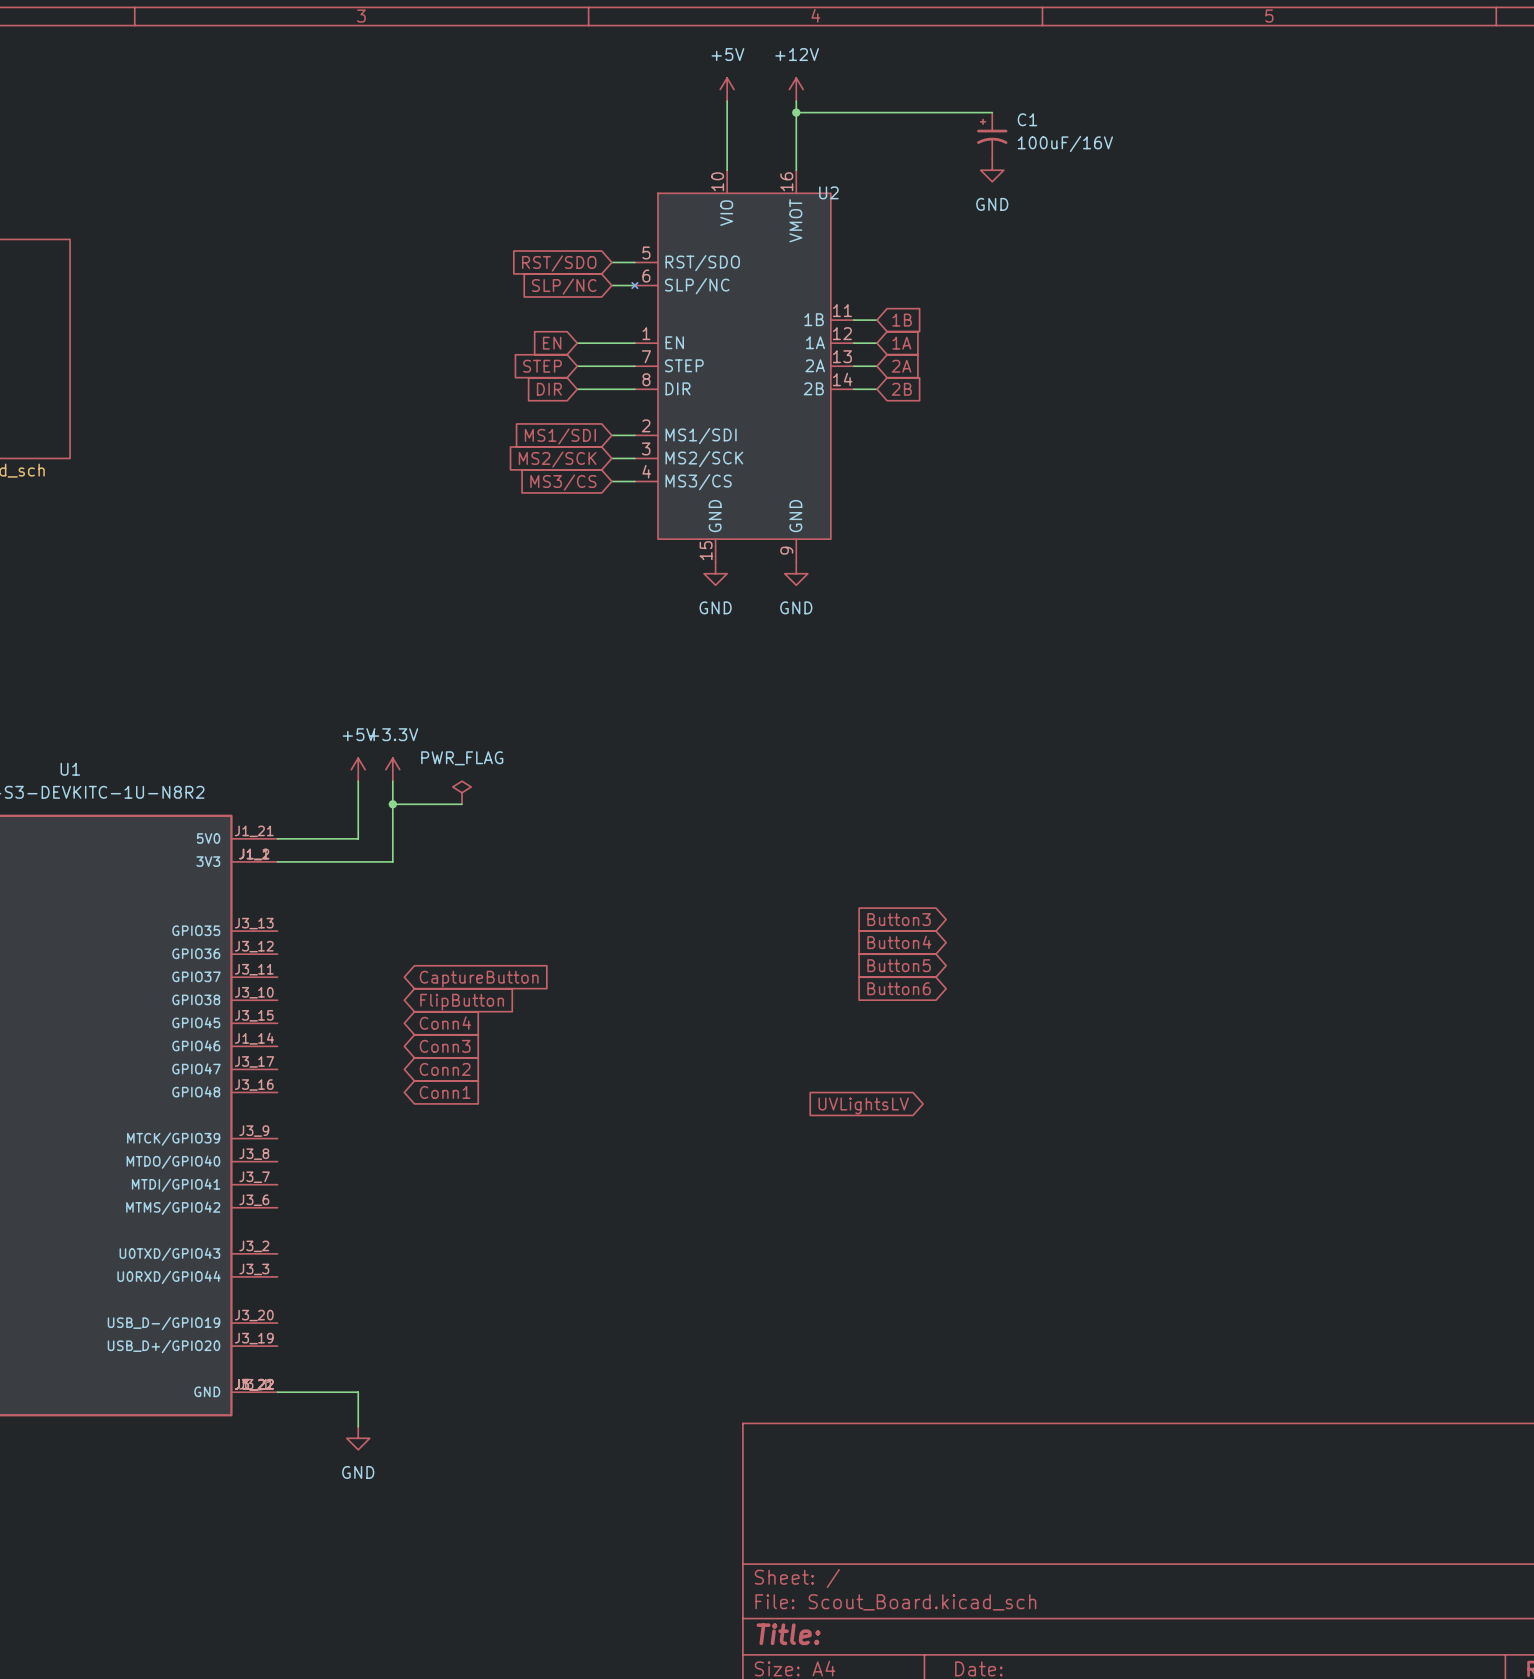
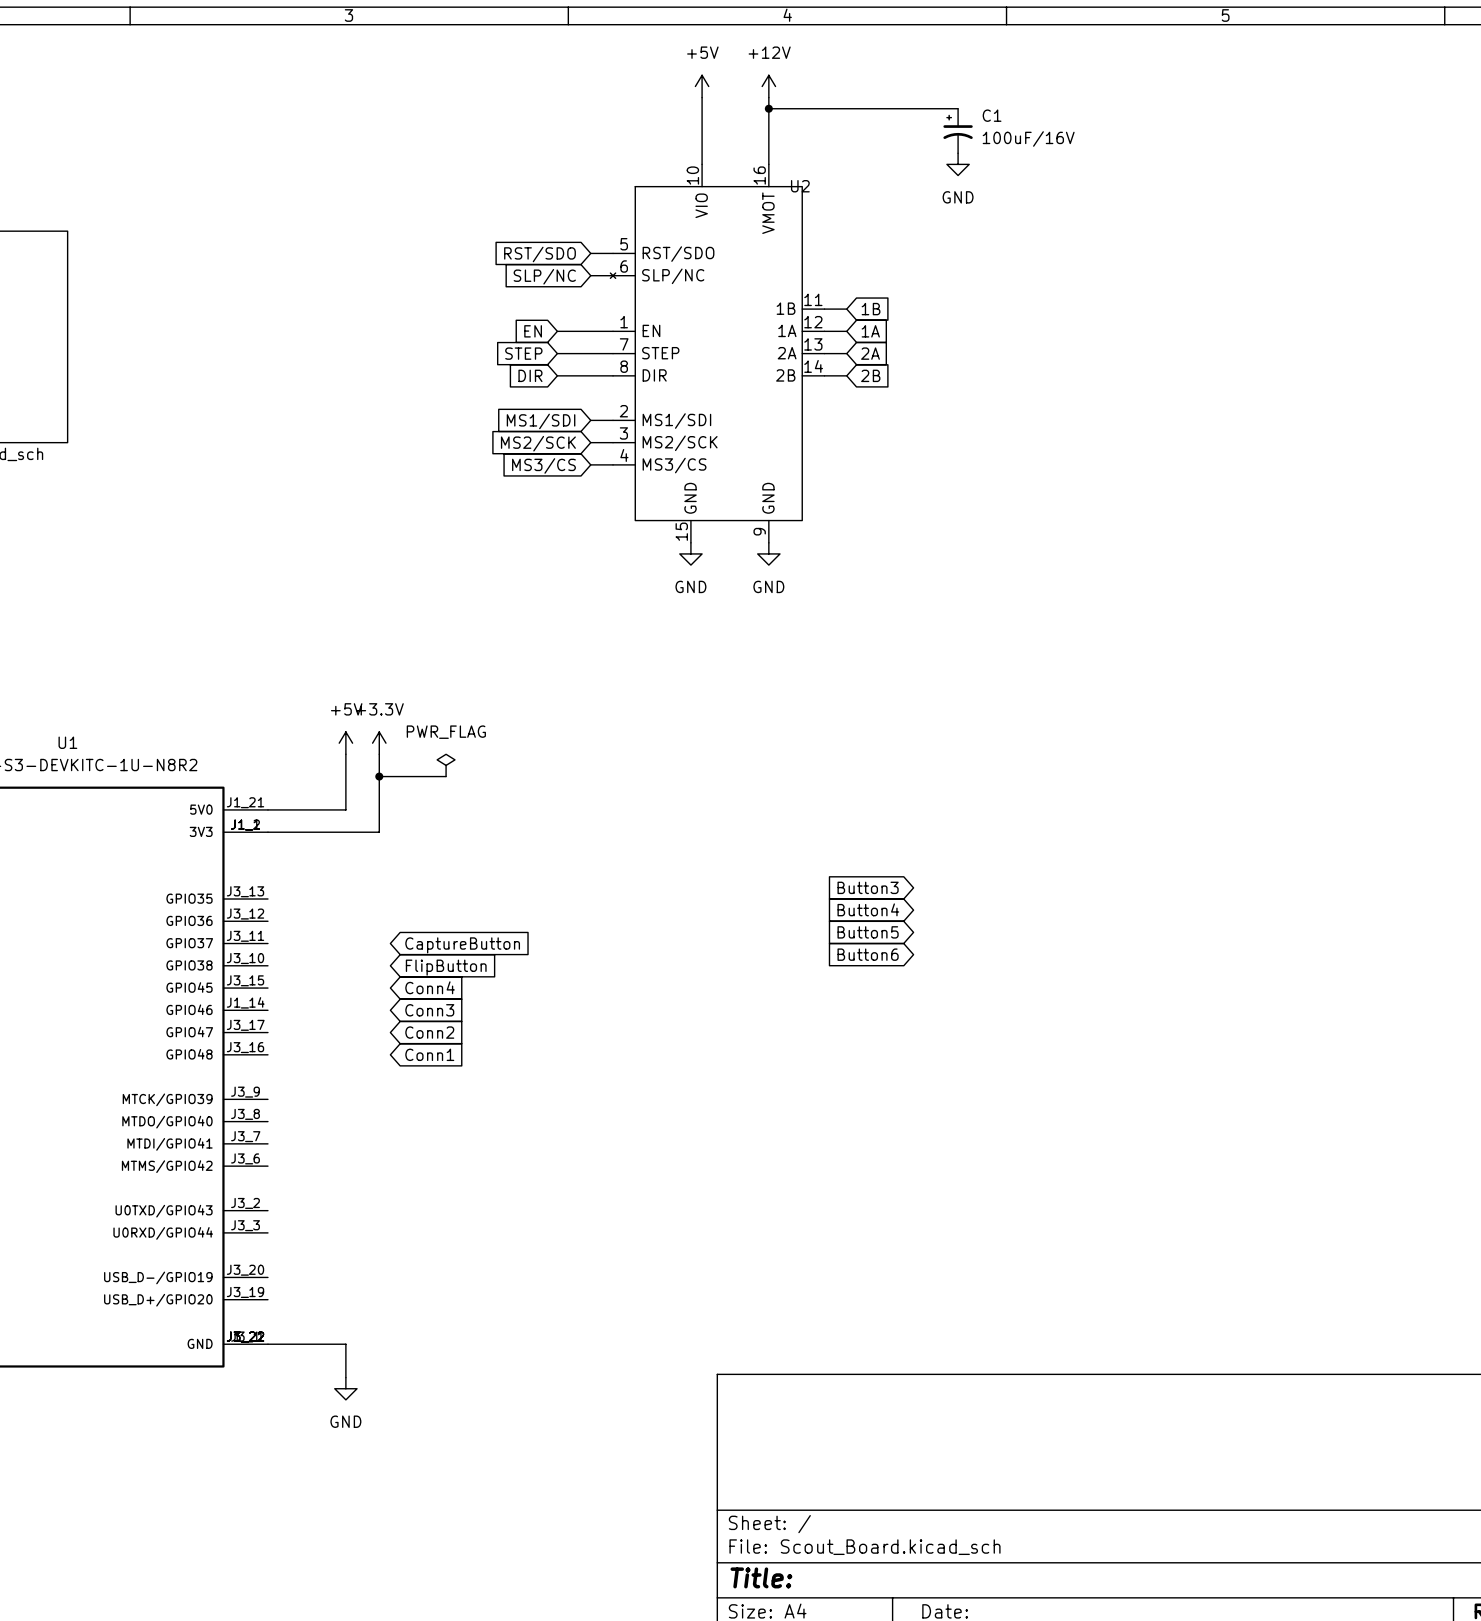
global label: UVLightsLV (863, 1105) -> none

